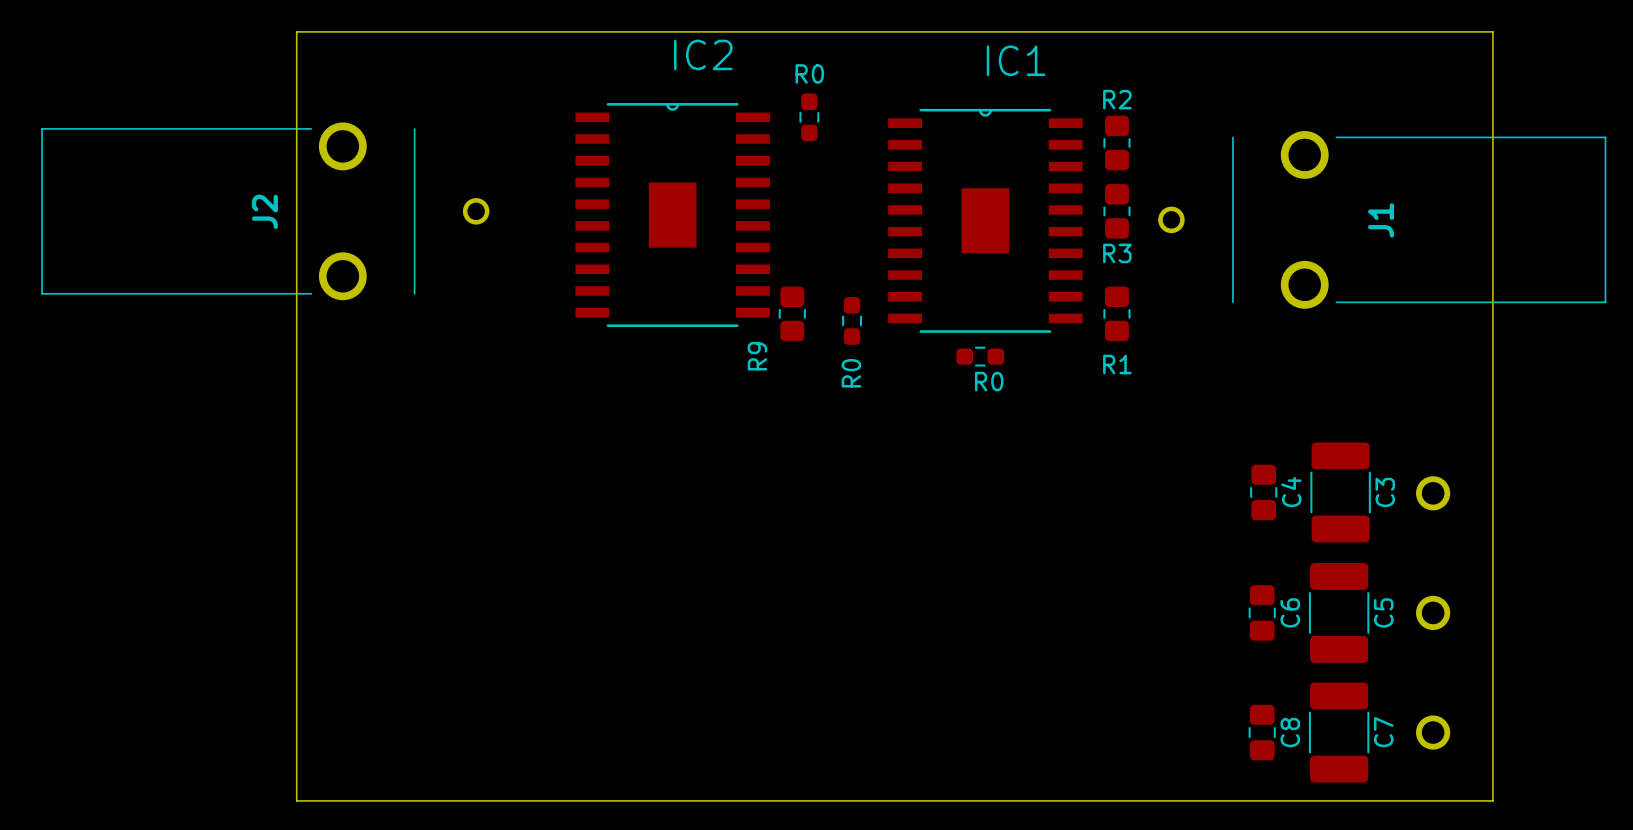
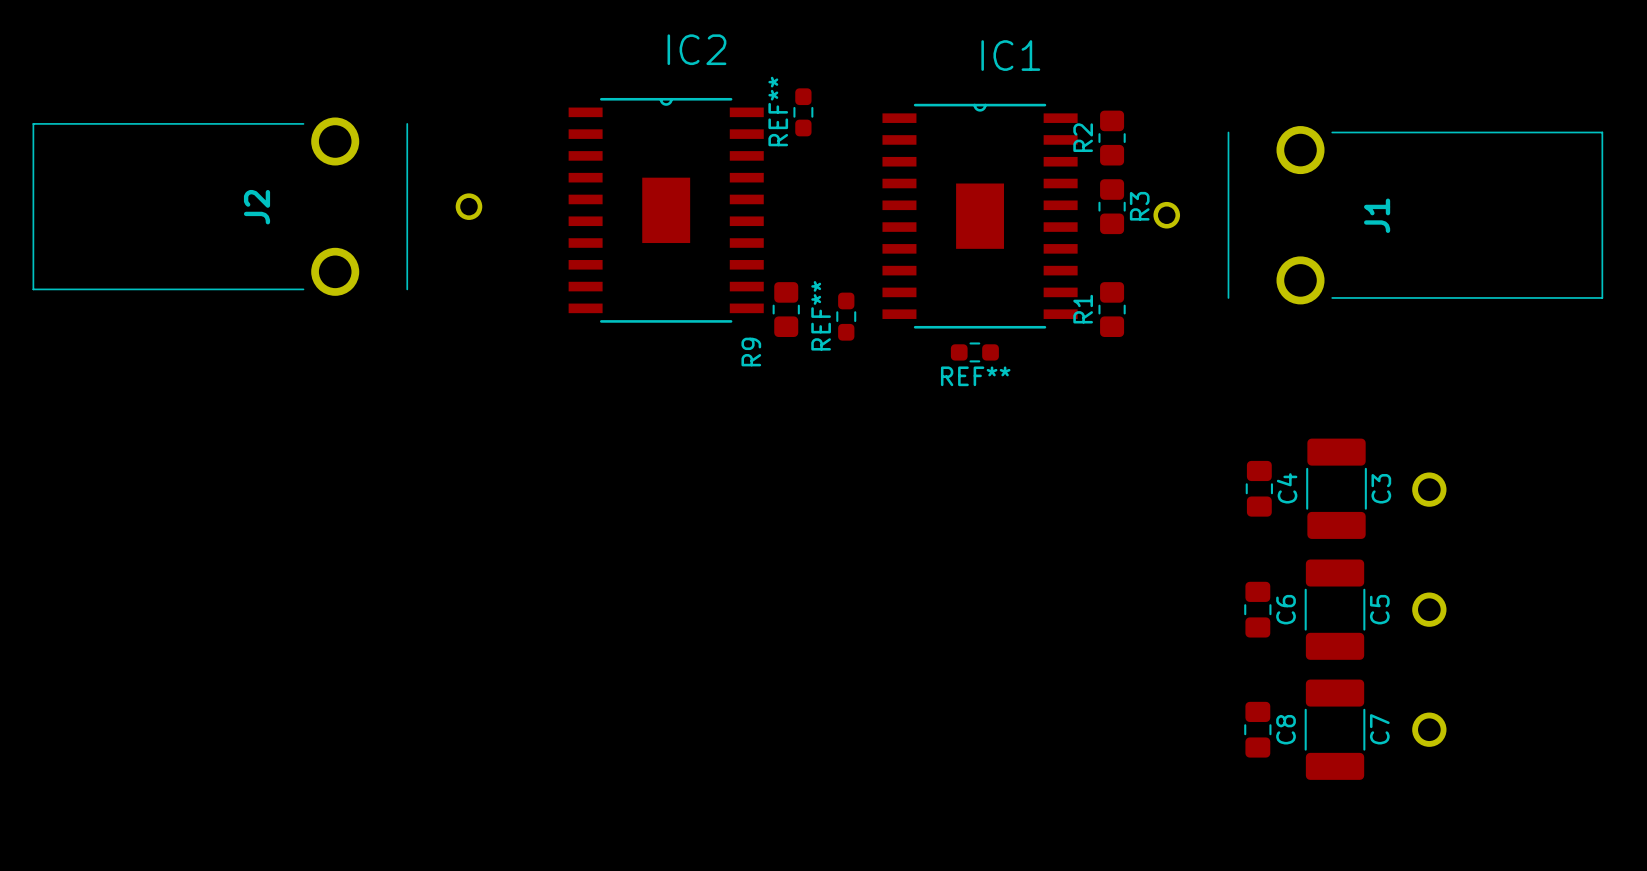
board edge: (296, 31) (1492, 31) (1492, 800) (296, 800) (296, 31) -> none
R0 name: R0 (809, 73) -> REF** (778, 111)
R2 name rotation: 0° (1117, 99) -> 90° counterclockwise (1083, 137)
R2 name position: R2 (1117, 99) -> R2 (1083, 137)
R3 name rotation: 0° (1117, 253) -> 90° counterclockwise (1139, 206)
R3 name position: R3 (1117, 253) -> R3 (1139, 206)
R1 name rotation: 0° (1117, 364) -> 90° counterclockwise (1083, 309)
R1 name position: R1 (1117, 364) -> R1 (1083, 309)
R0 name: R0 (851, 373) -> REF** (821, 315)
R0 name: R0 (989, 381) -> REF** (975, 376)

